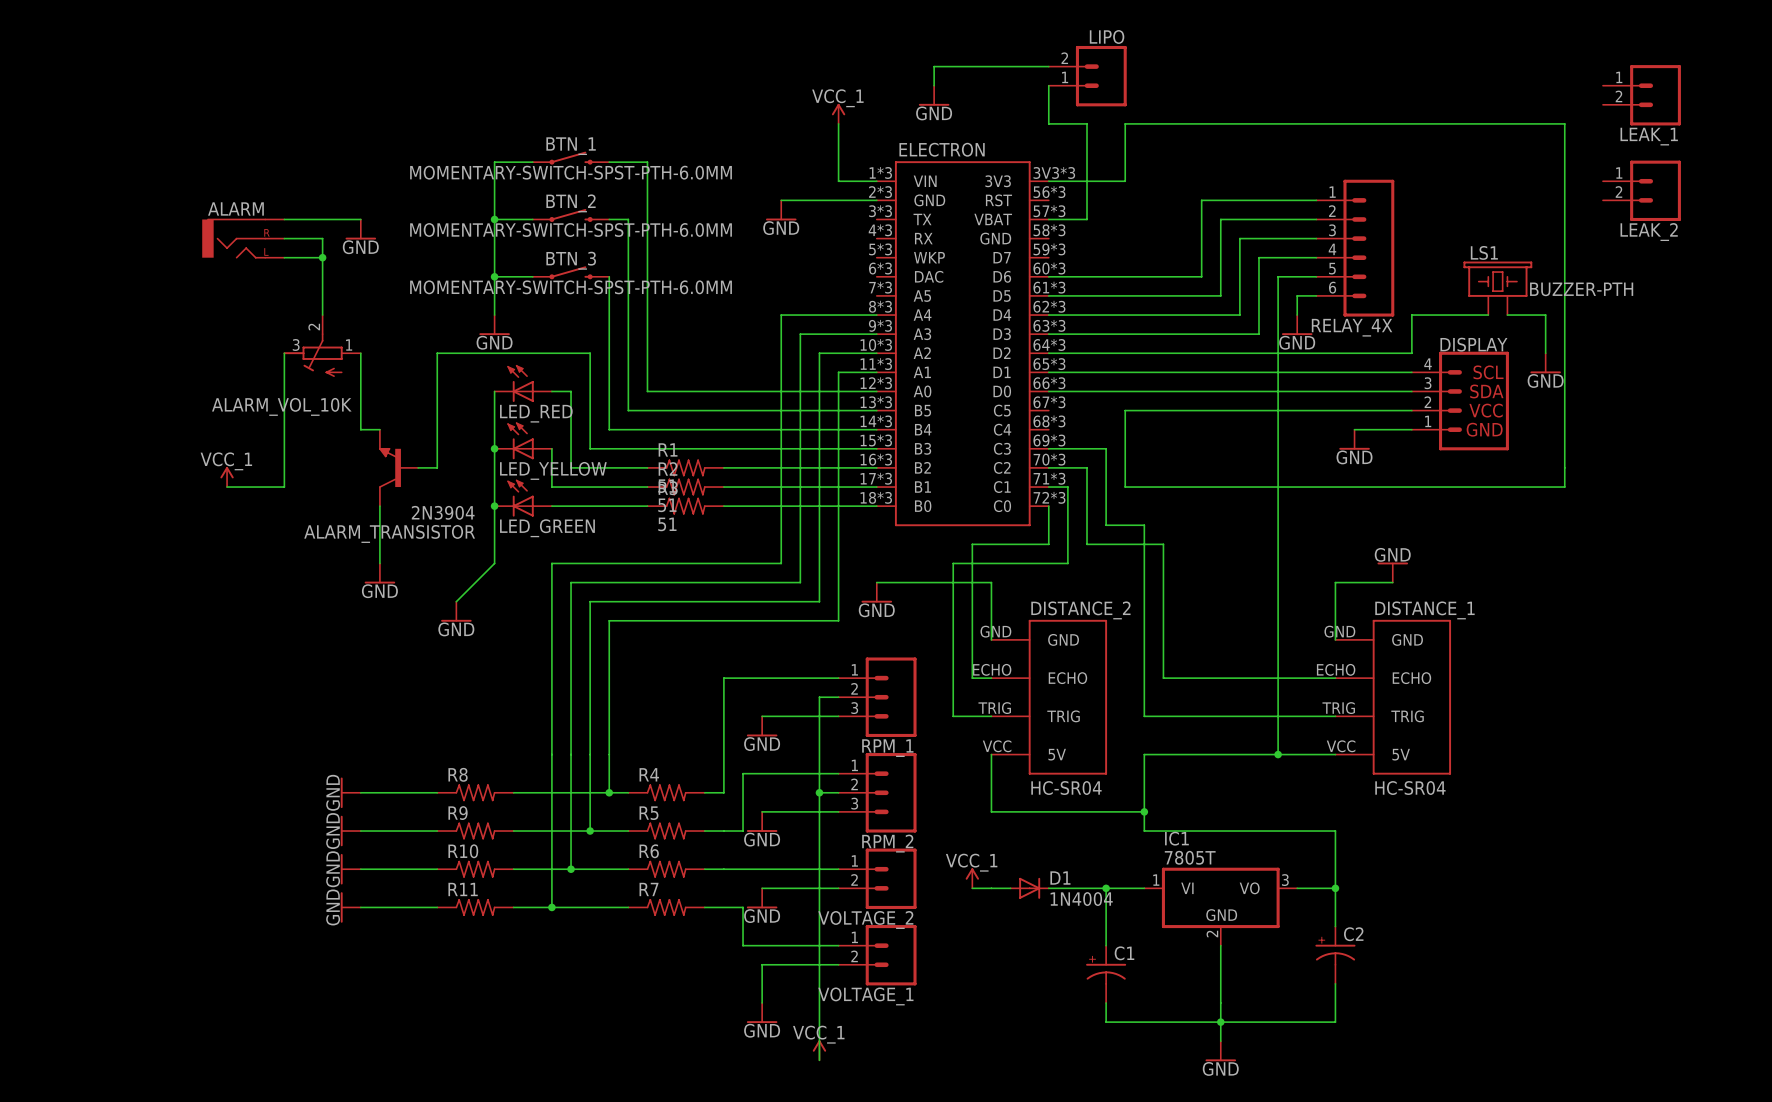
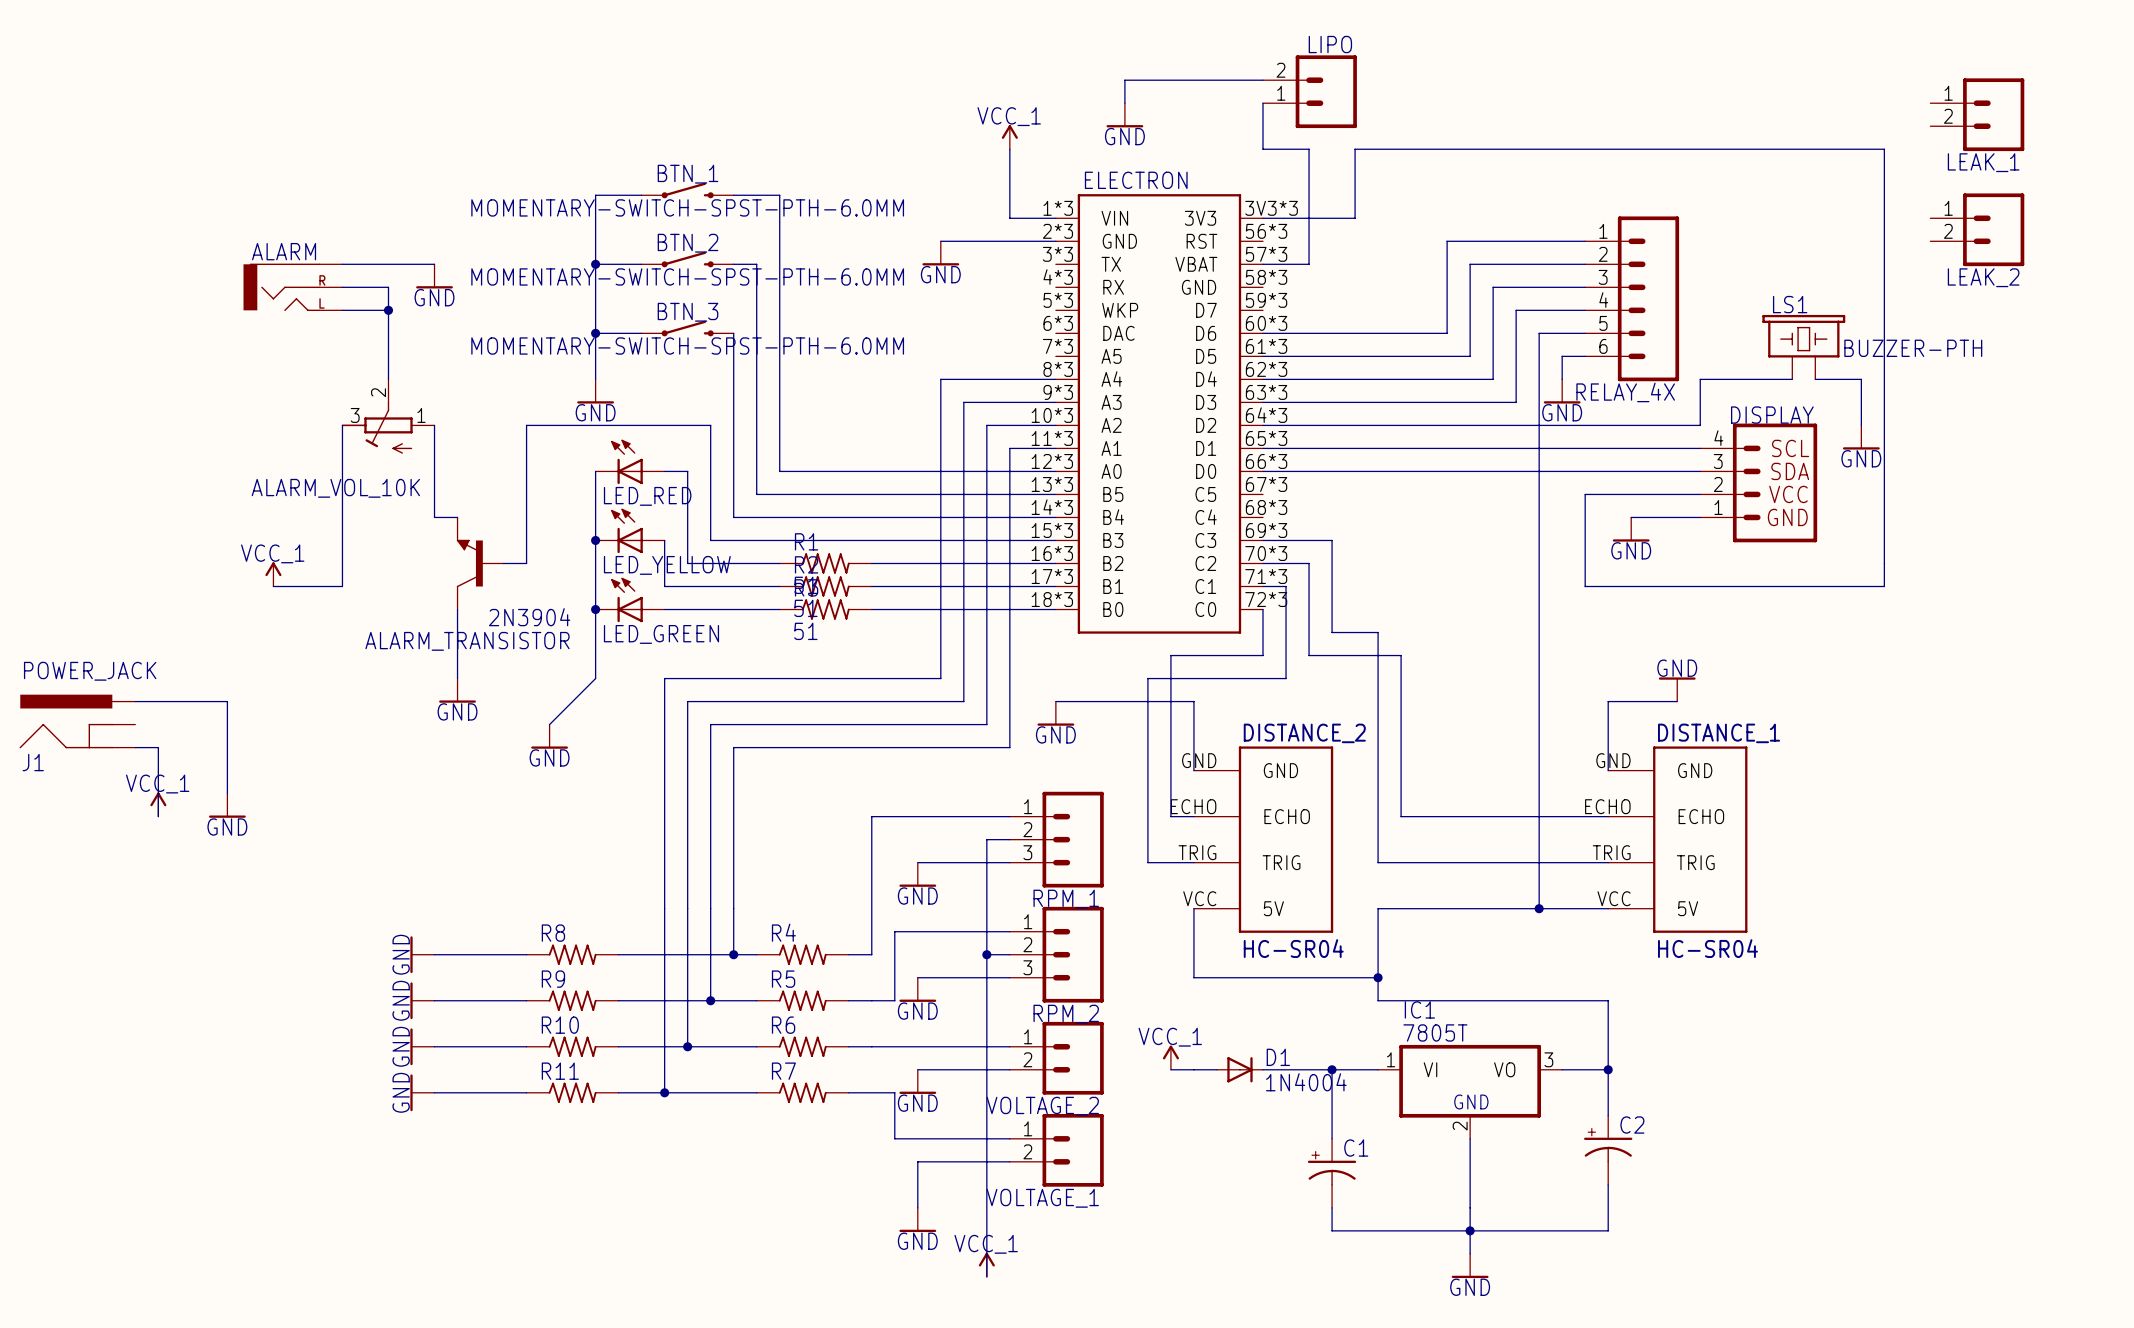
wire: (1316, 410) (1125, 410) (1125, 487) (1316, 487) -> (1585, 494) (1585, 586)
wire: none -> (135, 701) (227, 701) (227, 793)
J1: none -> POWER_JACK (77, 721)
wire: none -> (135, 747) (158, 747) (158, 816)
power symbol: none -> VCC_1 (158, 804)
power symbol: none -> GND (227, 805)

